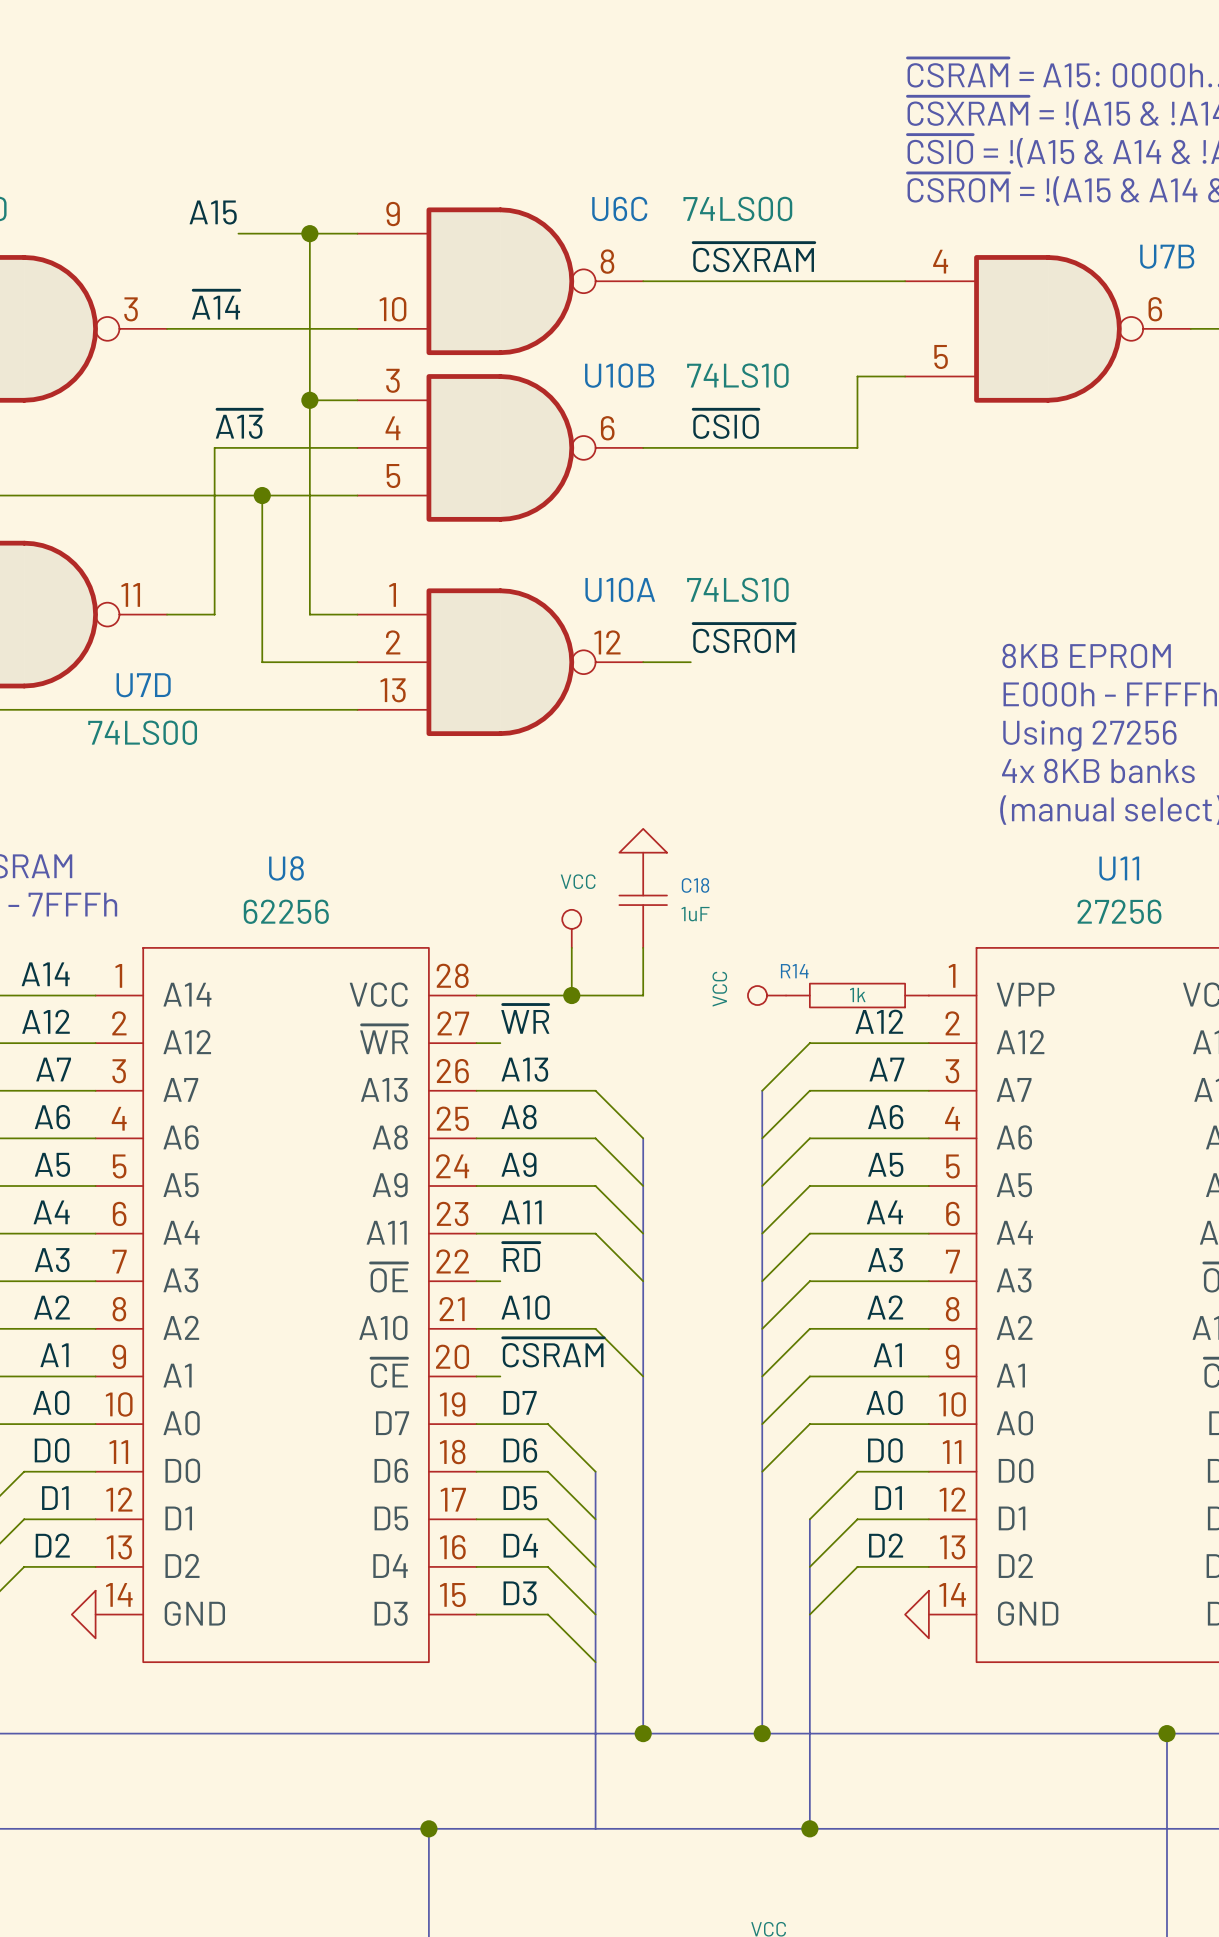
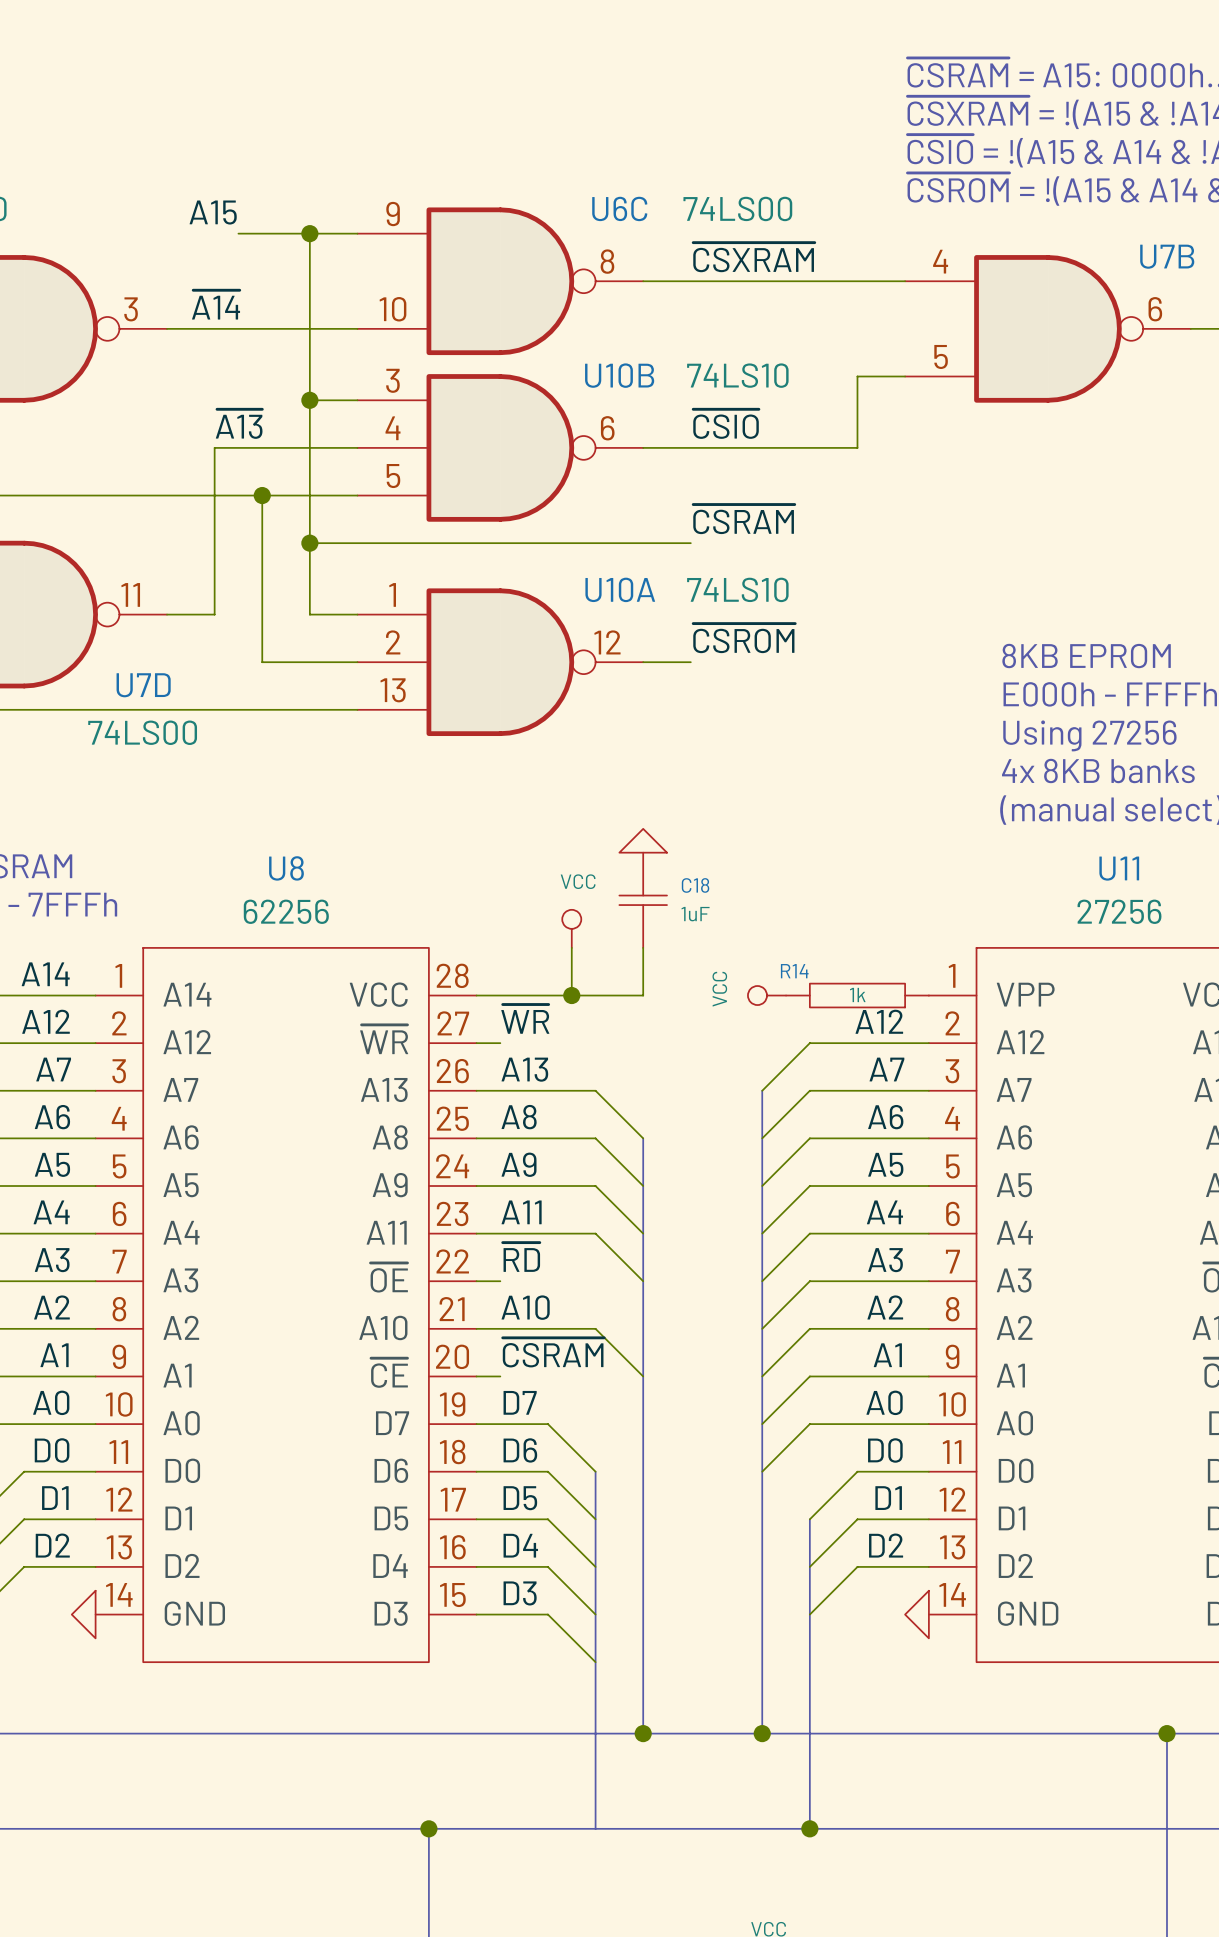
label: none -> ~{CSRAM} (743, 519)
wire: none -> (309, 543) (690, 543)
junction: none -> (309, 543)

